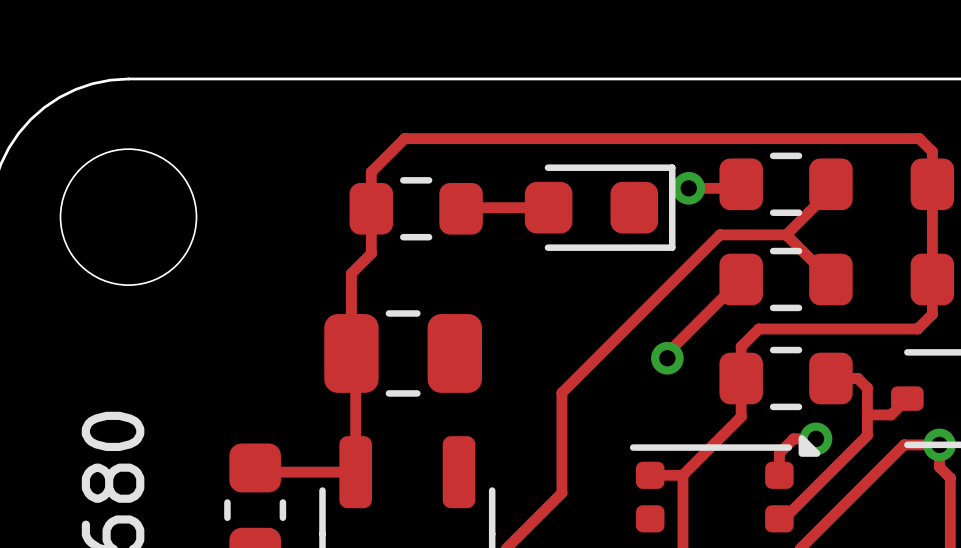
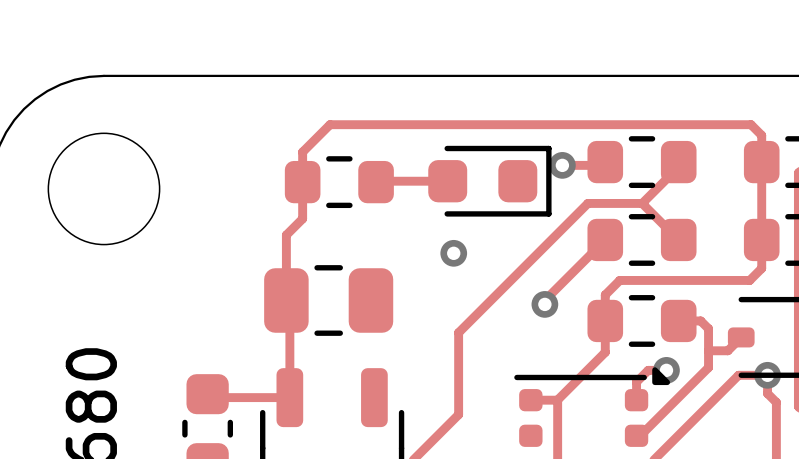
via: none -> (453, 253)

